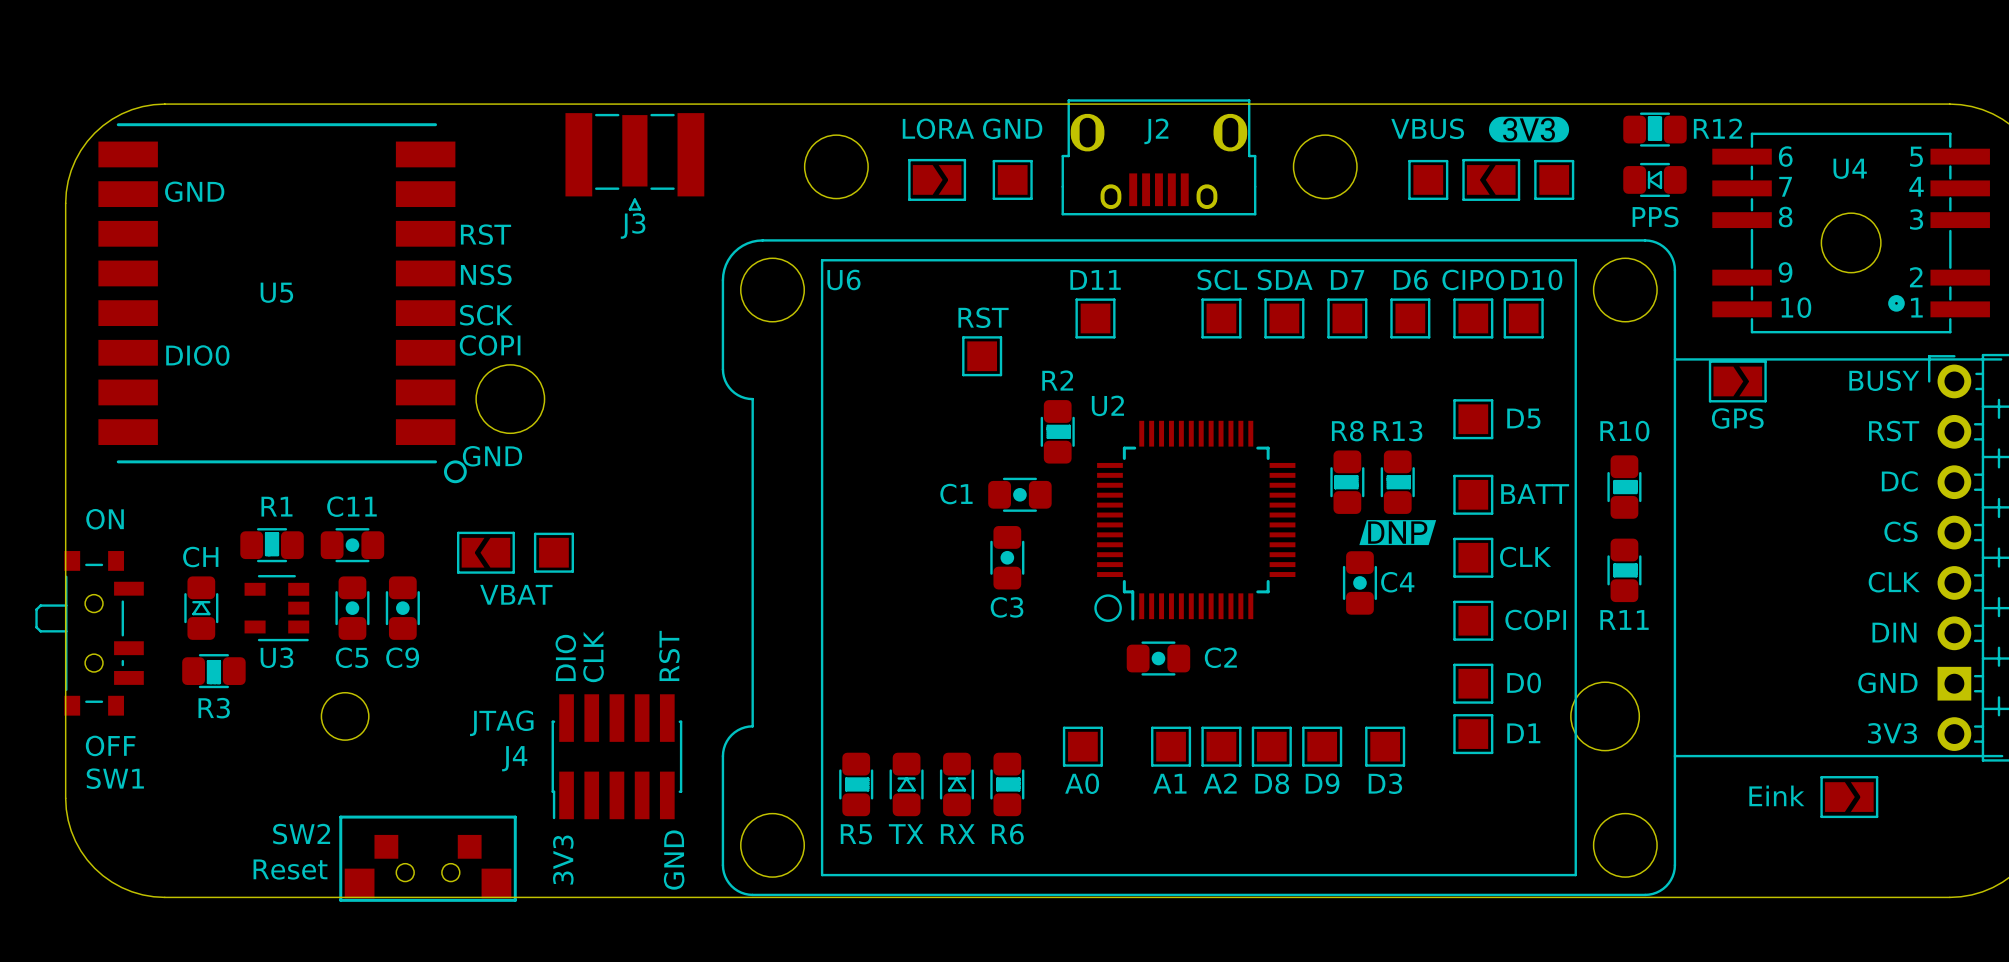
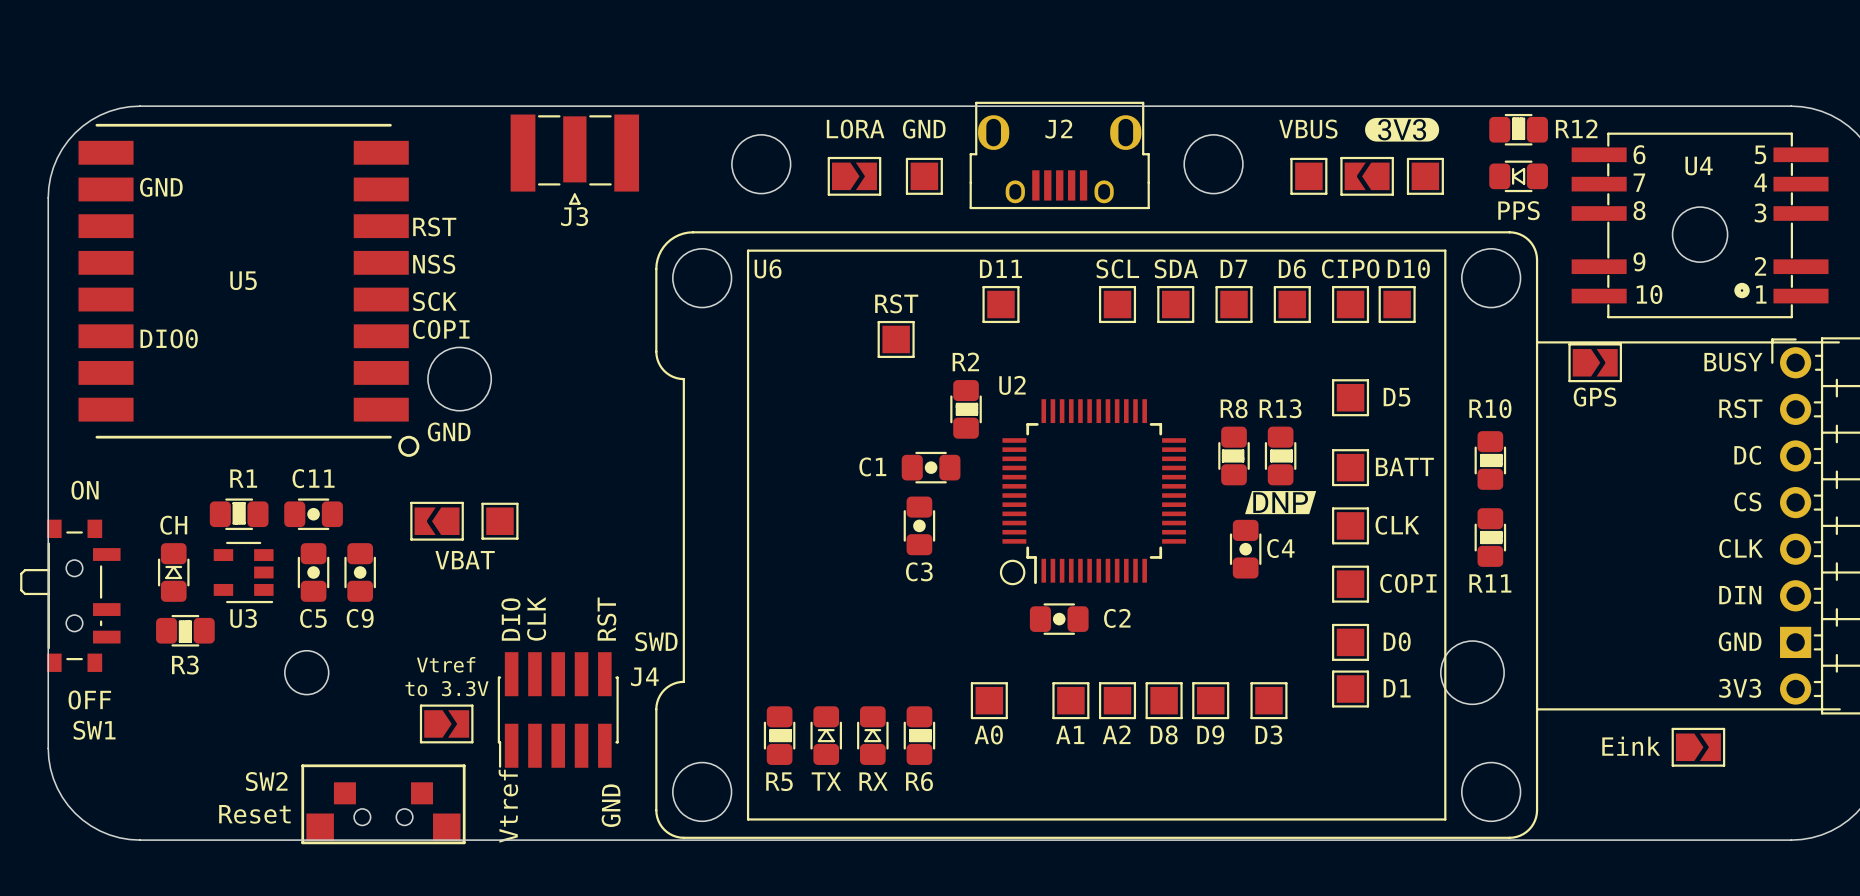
text: none -> SWD (656, 641)
text: none -> Vtref (446, 664)
text: JTAG (501, 723) -> none
text: none -> to 3.3V (447, 688)
J4 name position: J4 (514, 758) -> J4 (644, 676)
part: none -> (446, 723)
text: 3V3 (563, 860) -> Vtref (508, 806)

